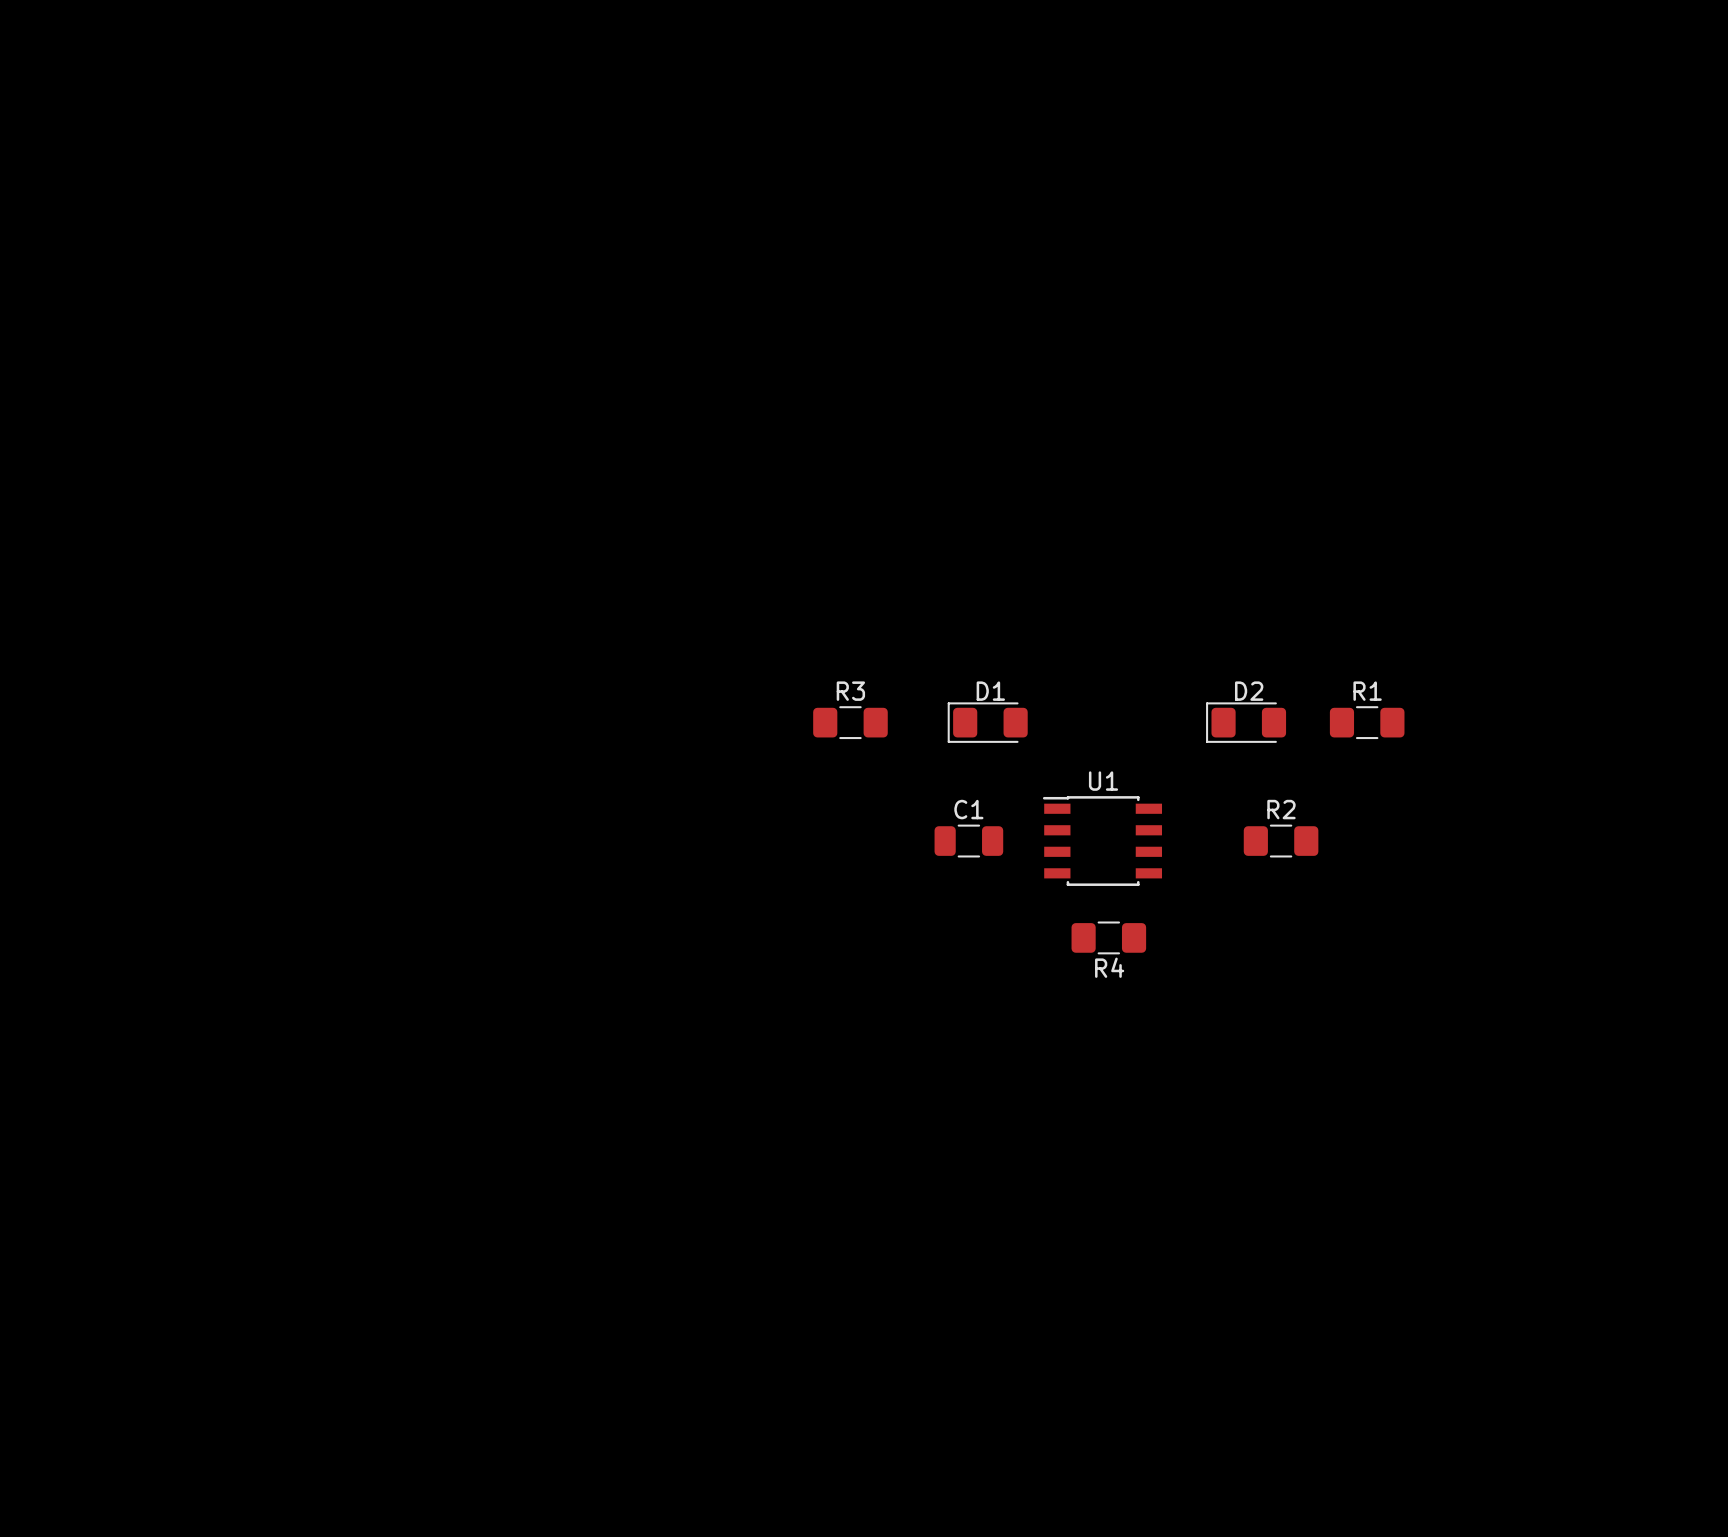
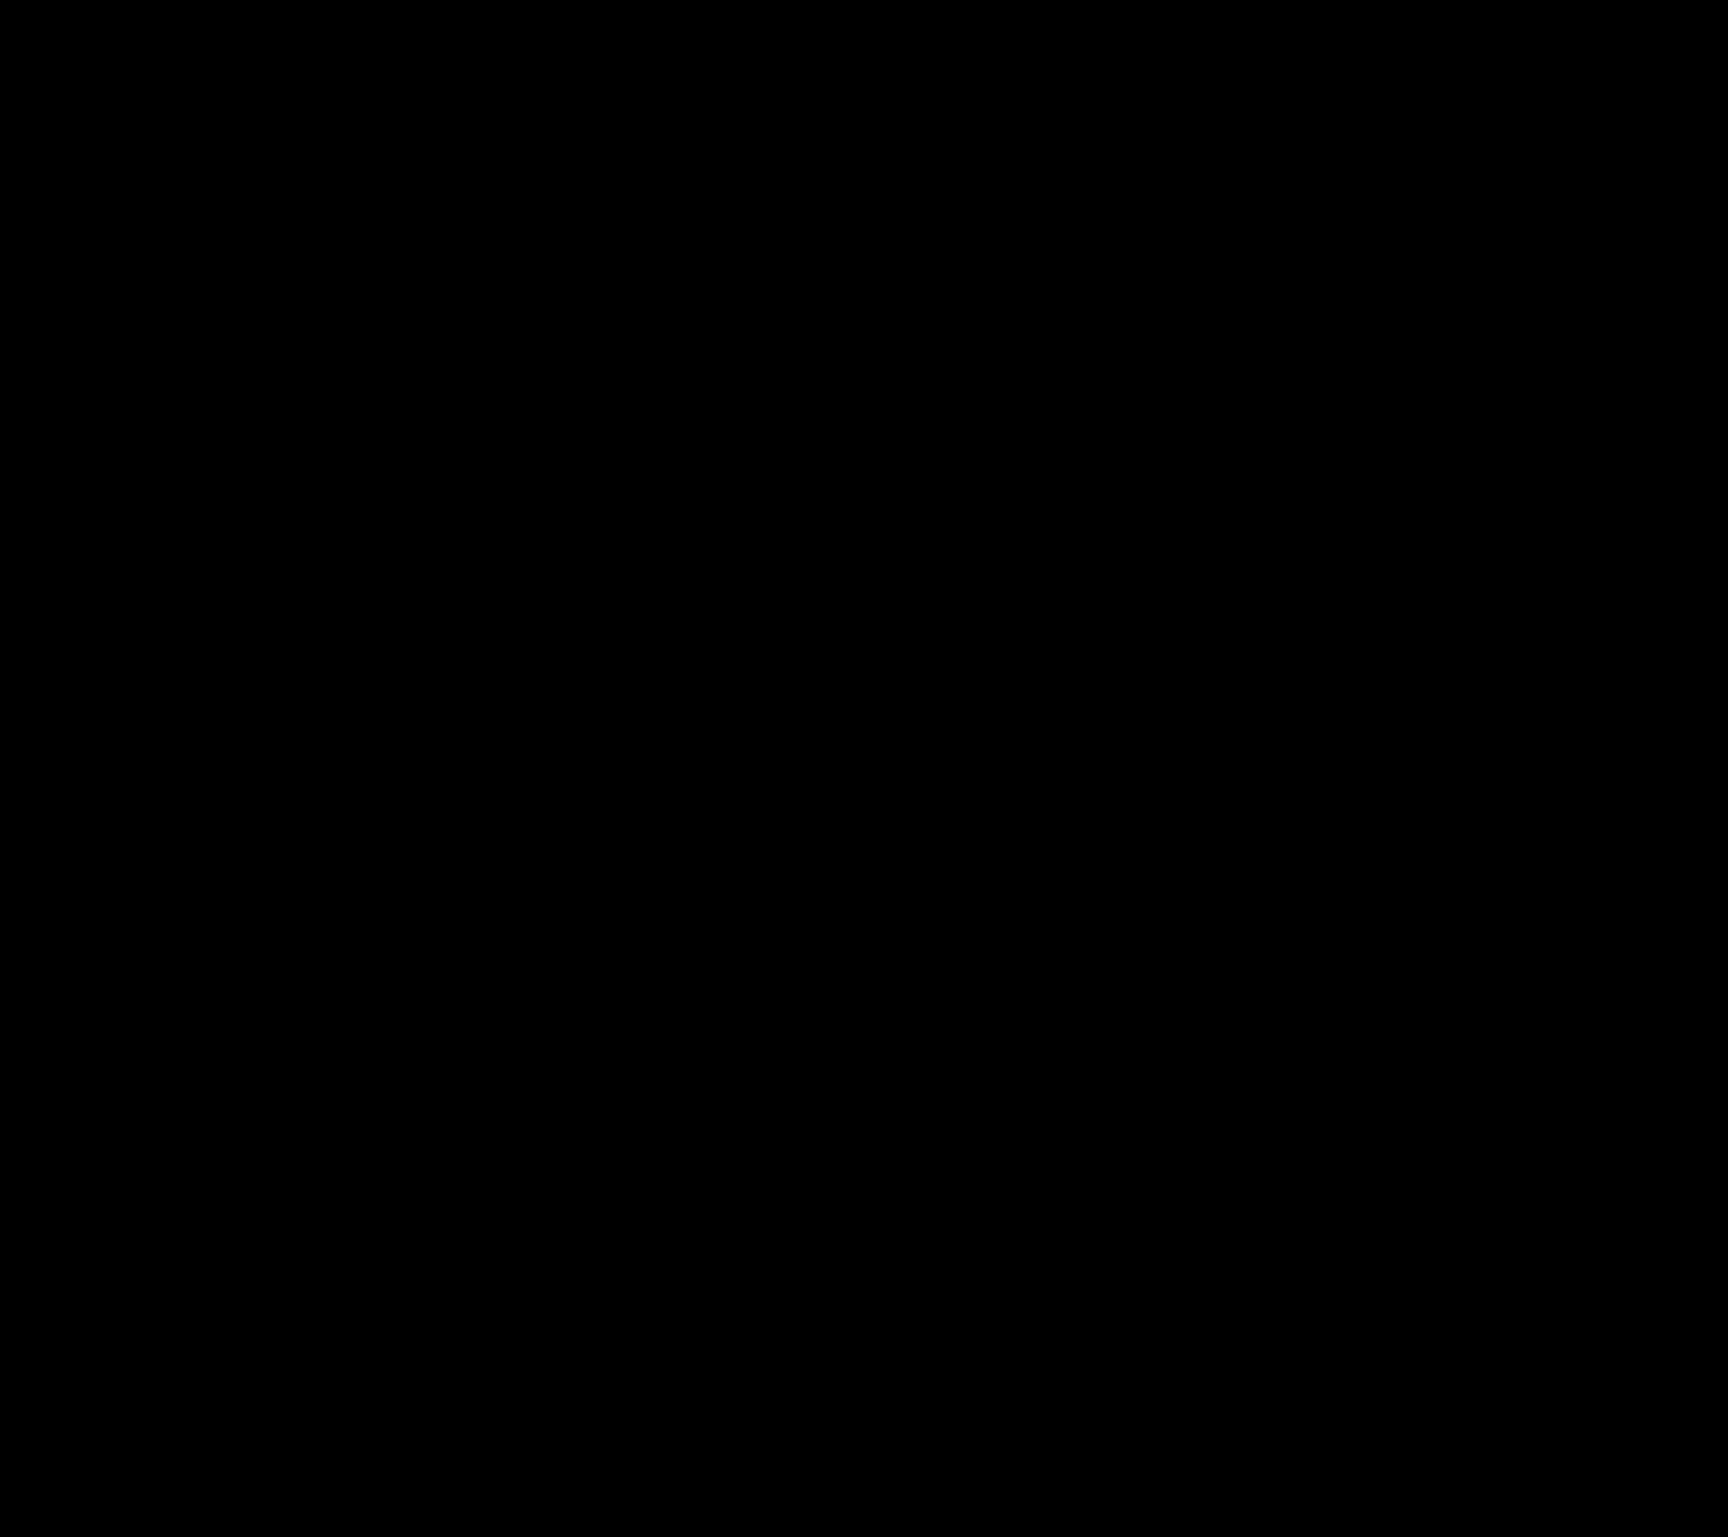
R3: (850, 722) -> none
D1: (987, 722) -> none
D2: (1246, 722) -> none
R1: (1367, 722) -> none
C1: (968, 841) -> none
U1: (1102, 841) -> none
R2: (1281, 841) -> none
R4: (1108, 937) -> none

